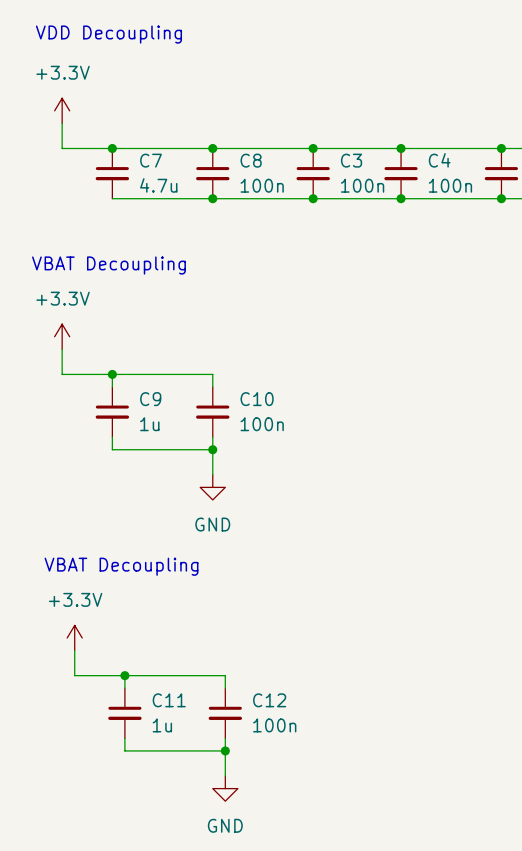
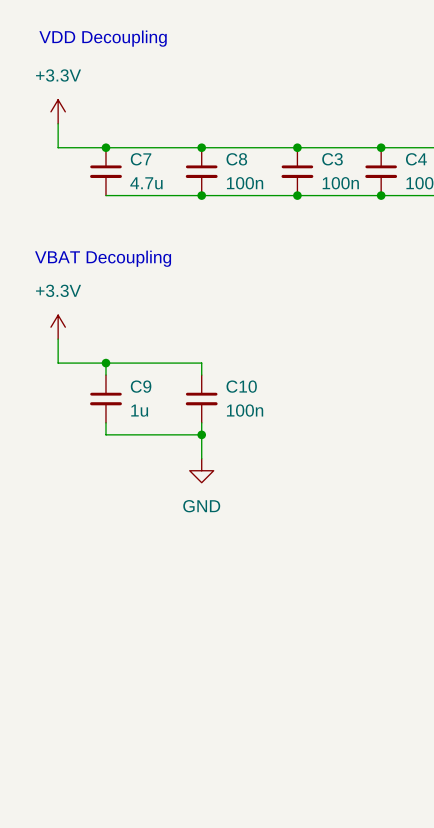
text: VBAT Decoupling (121, 566) -> none
power symbol: +3.3V (74, 637) -> none
wire: (74, 650) (74, 675) (225, 675) (225, 688) -> none
wire: (124, 675) (124, 688) -> none
junction: (124, 675) -> none
C11: 1u (124, 713) -> none
C12: 100n (225, 713) -> none
wire: (124, 738) (124, 750) (225, 750) -> none
wire: (225, 738) (225, 776) -> none
junction: (225, 750) -> none
power symbol: GND (225, 788) -> none

